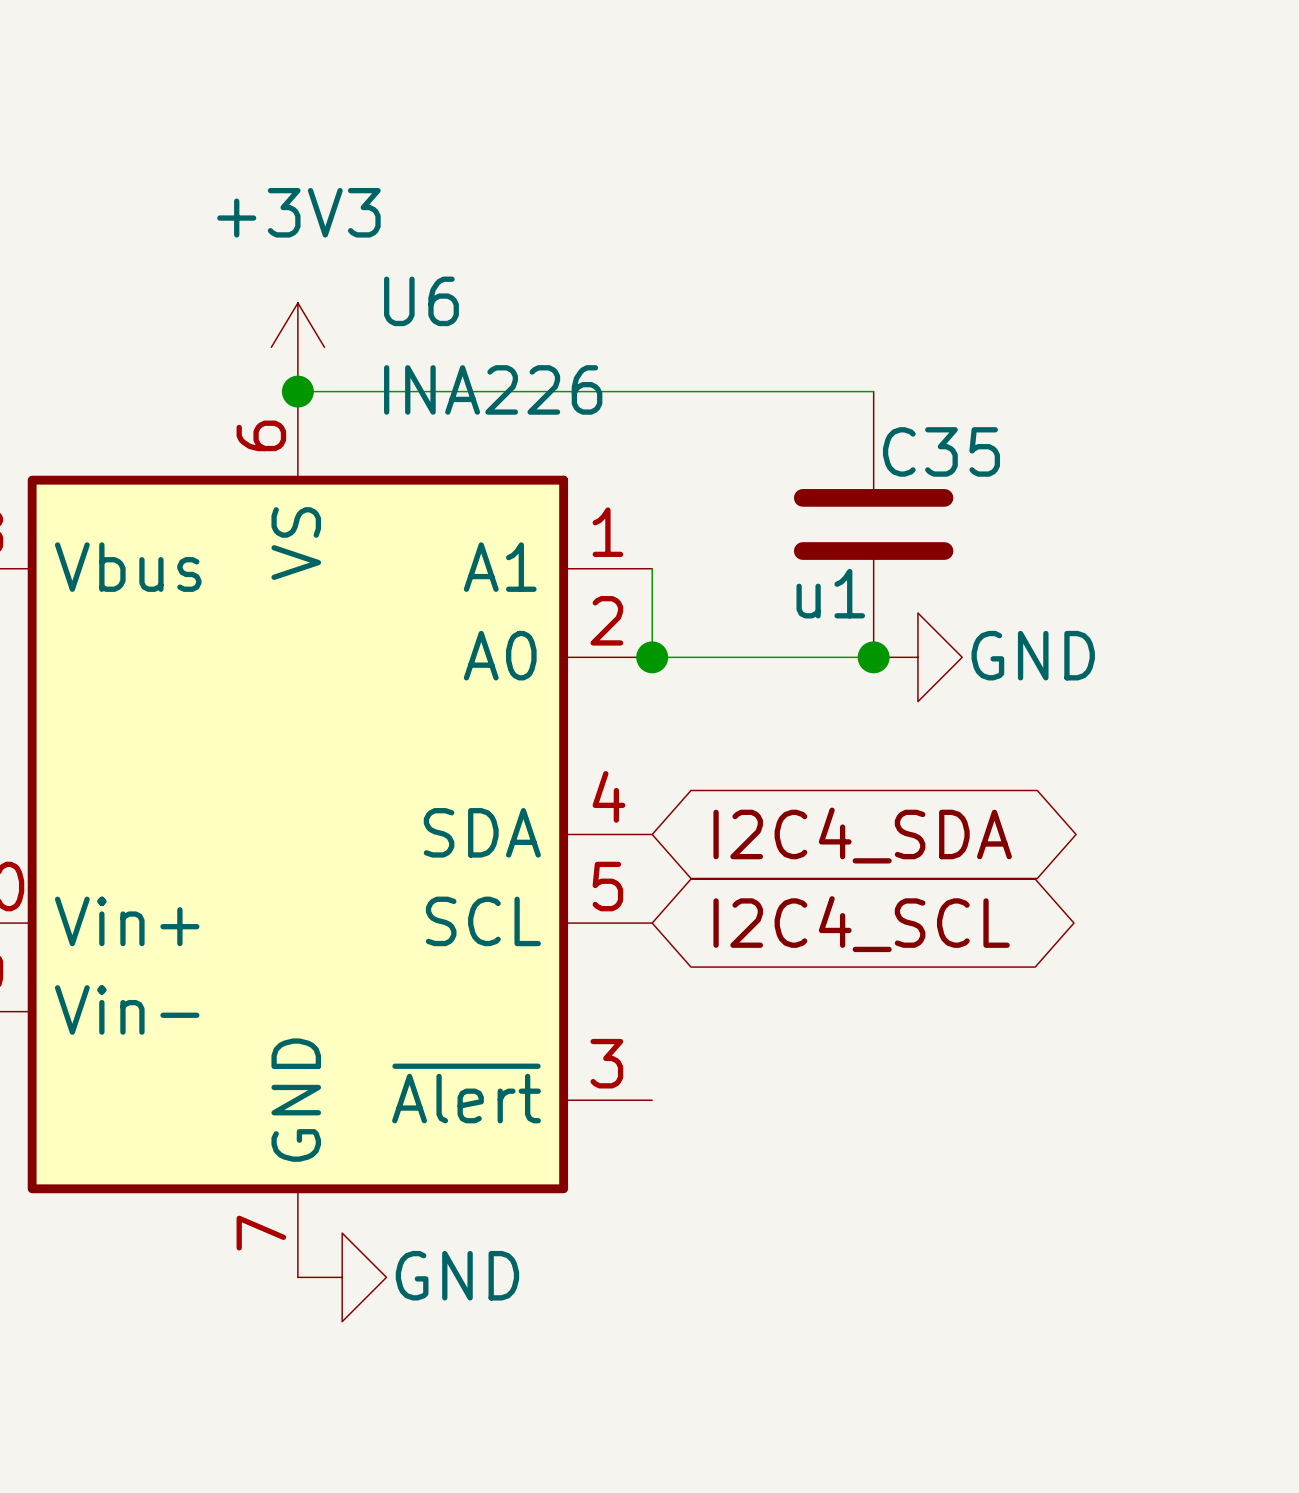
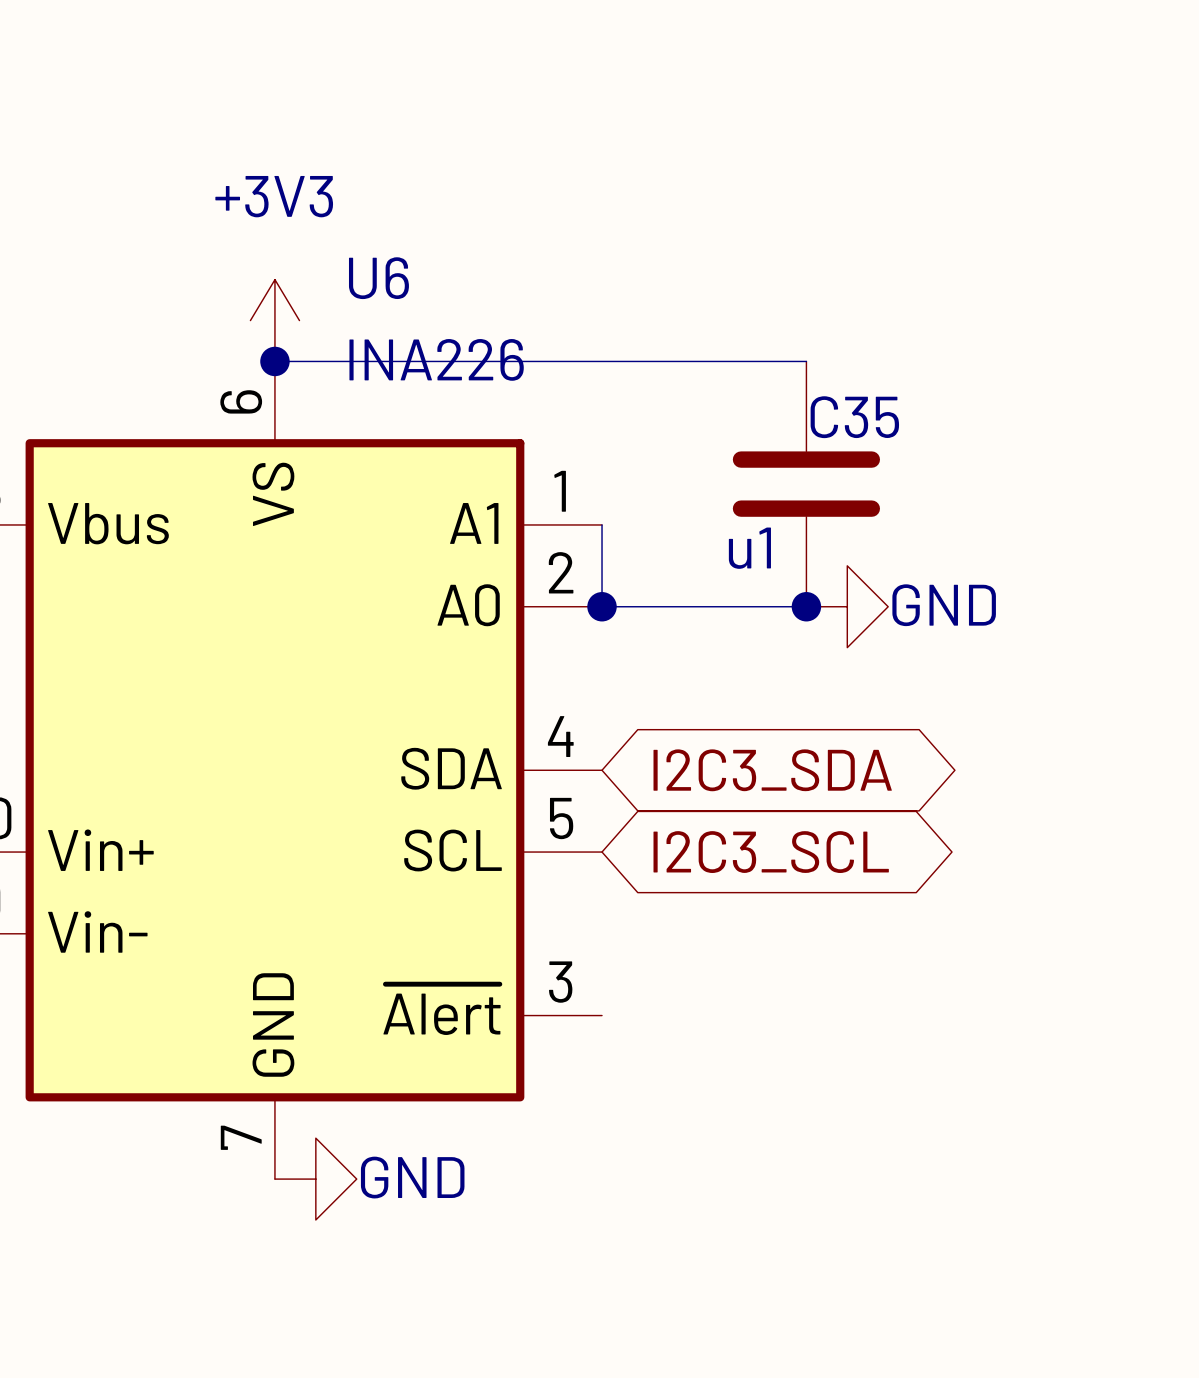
global label: I2C4_SDA (862, 835) -> I2C3_SDA (772, 770)
global label: I2C4_SCL (861, 924) -> I2C3_SCL (771, 852)

